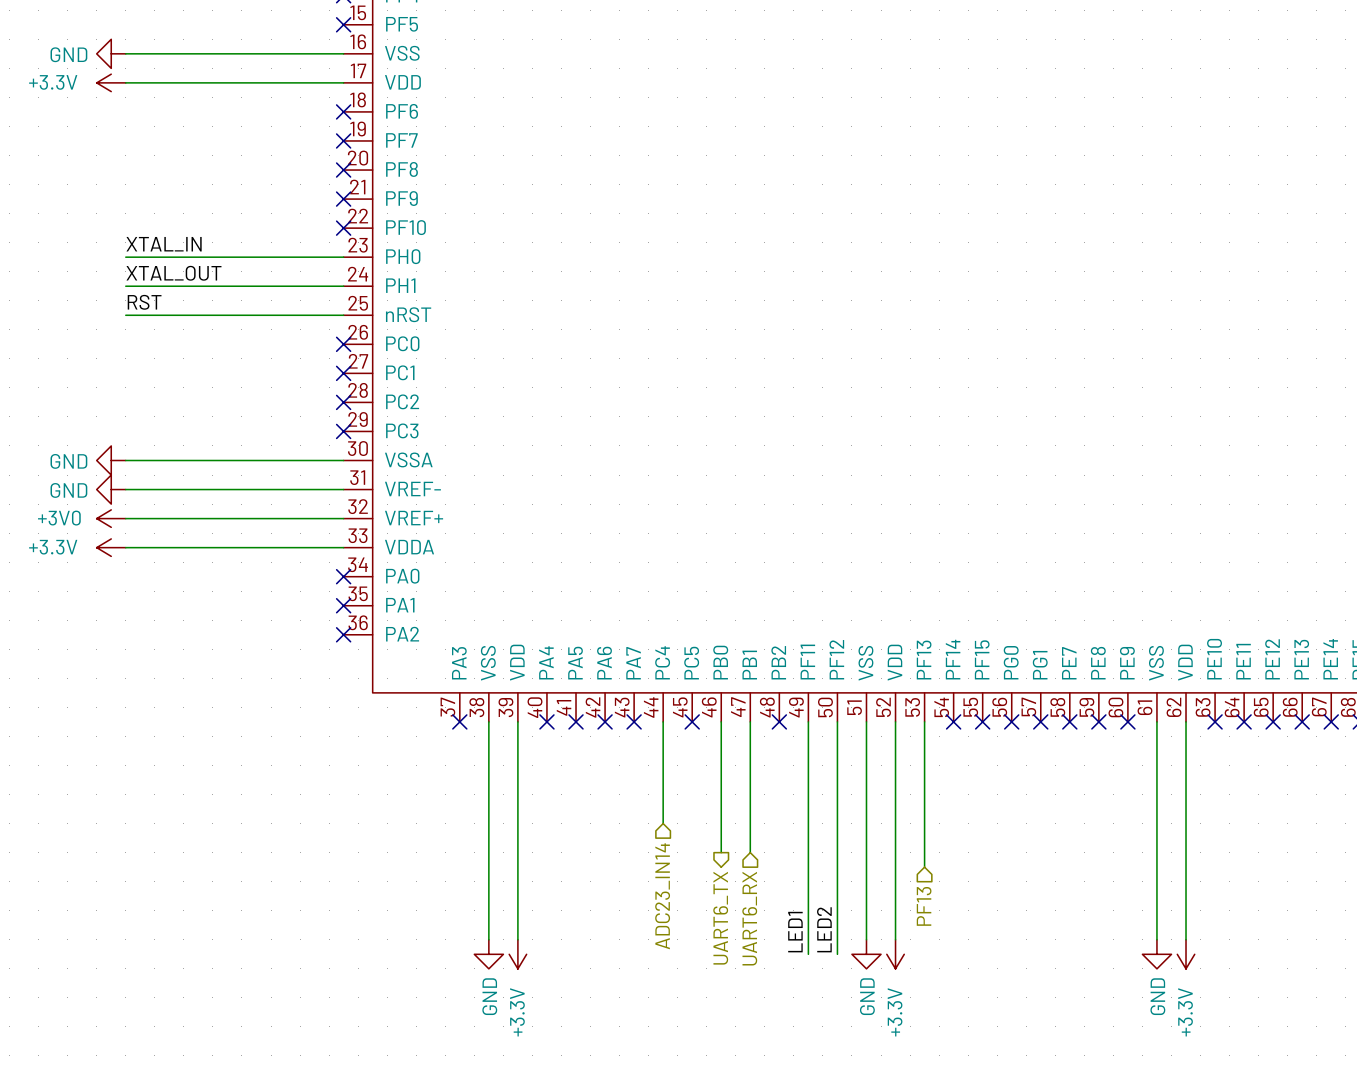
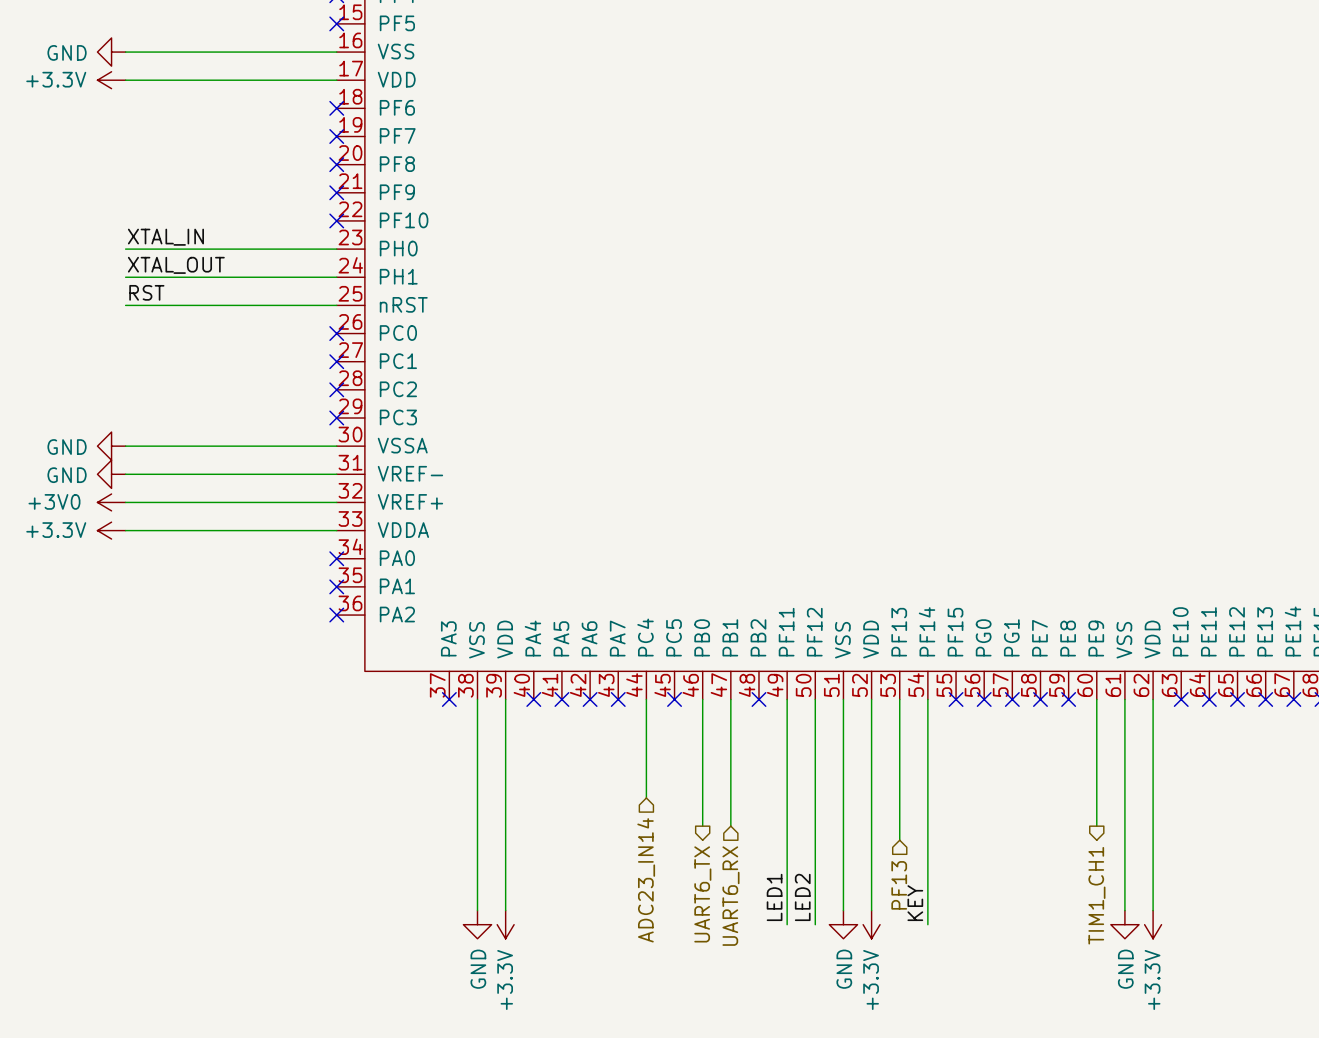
wire: none -> (927, 699) (927, 924)
no-connect mark: (953, 721) -> none
wire: none -> (1096, 699) (1096, 826)
no-connect mark: (1127, 721) -> none
hierarchical label: none -> TIM1_CH1 (1096, 895)
label: none -> KEY (915, 903)

